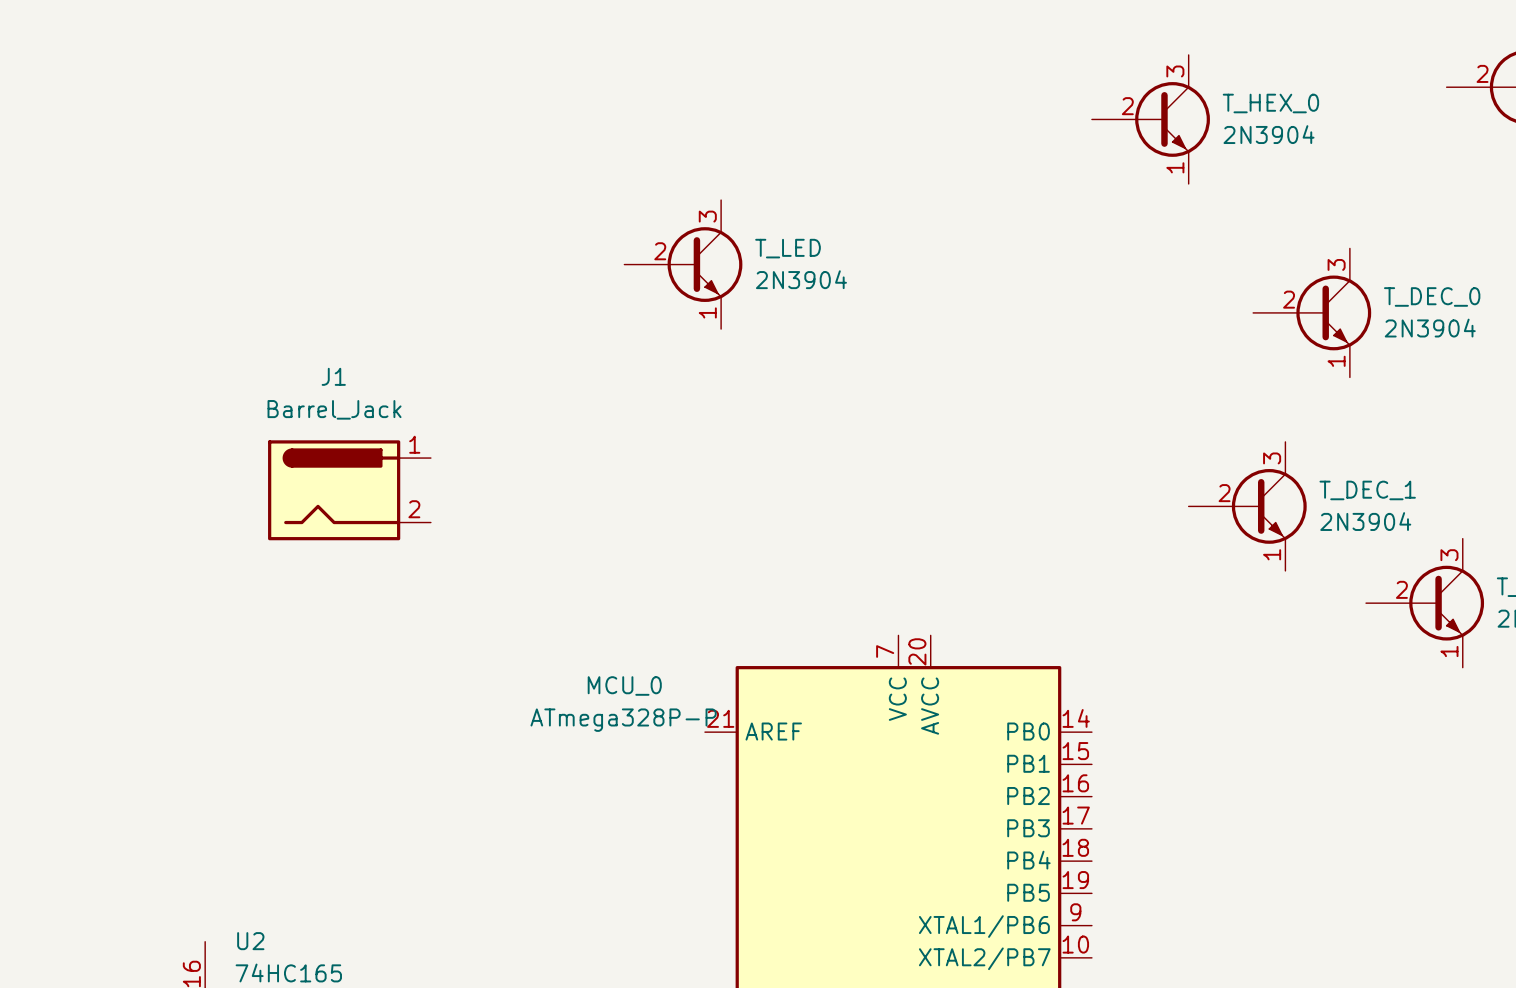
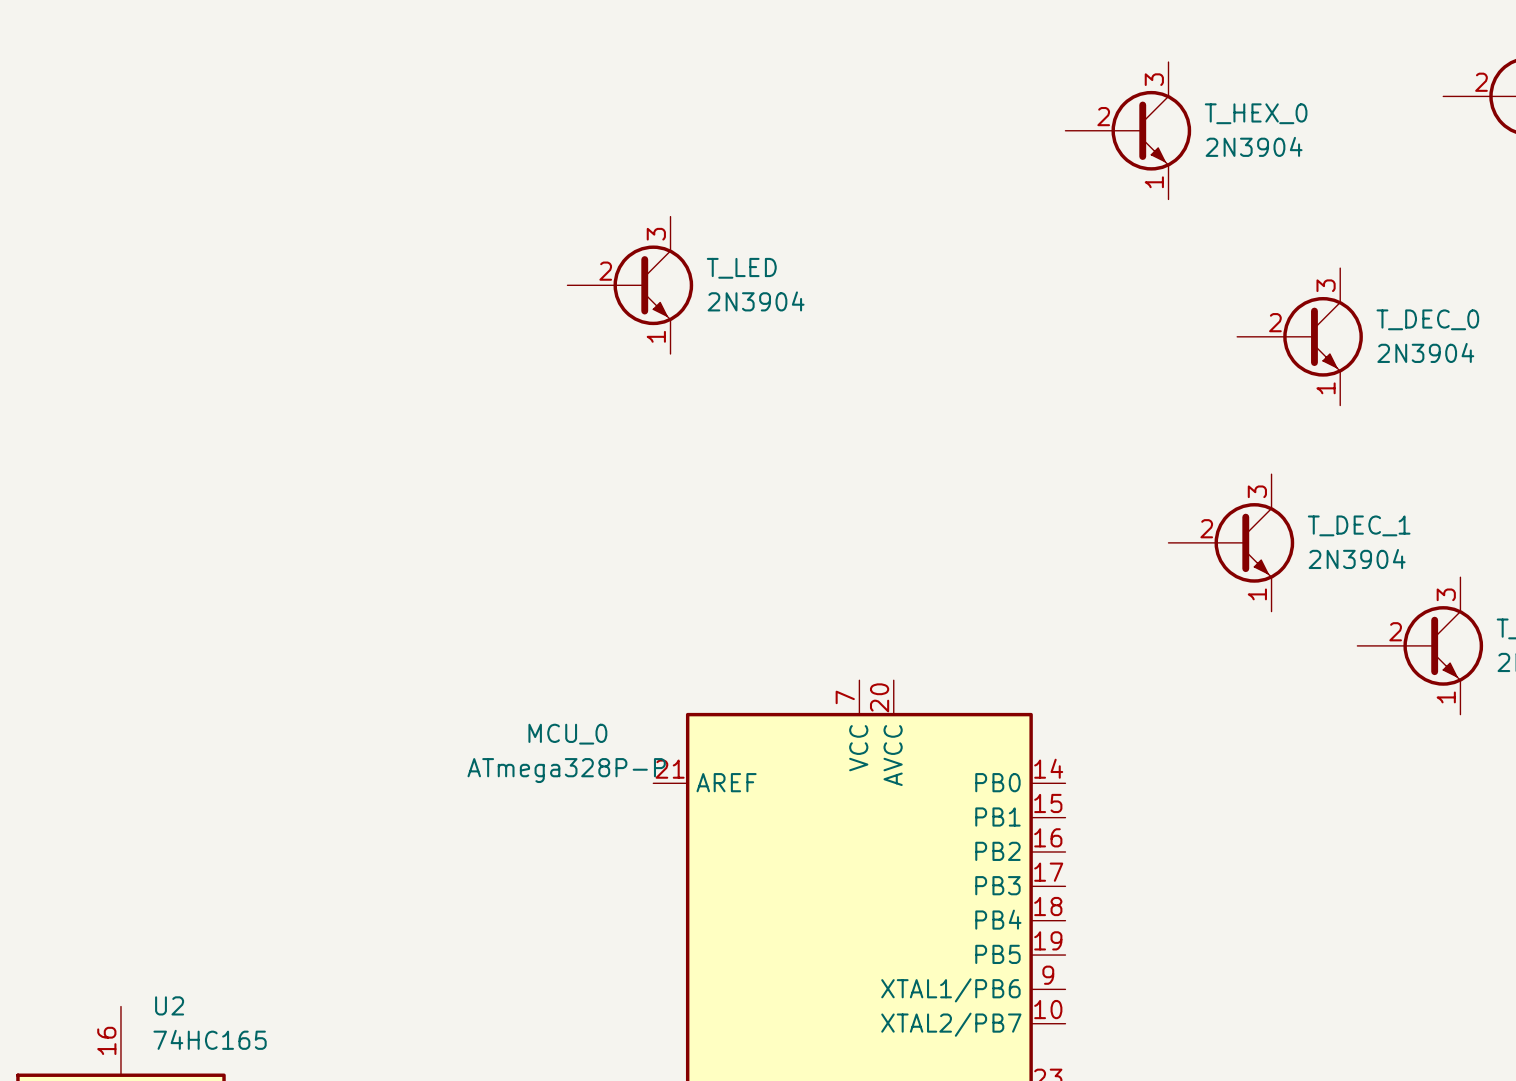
J1: Barrel_Jack (349, 490) -> none

